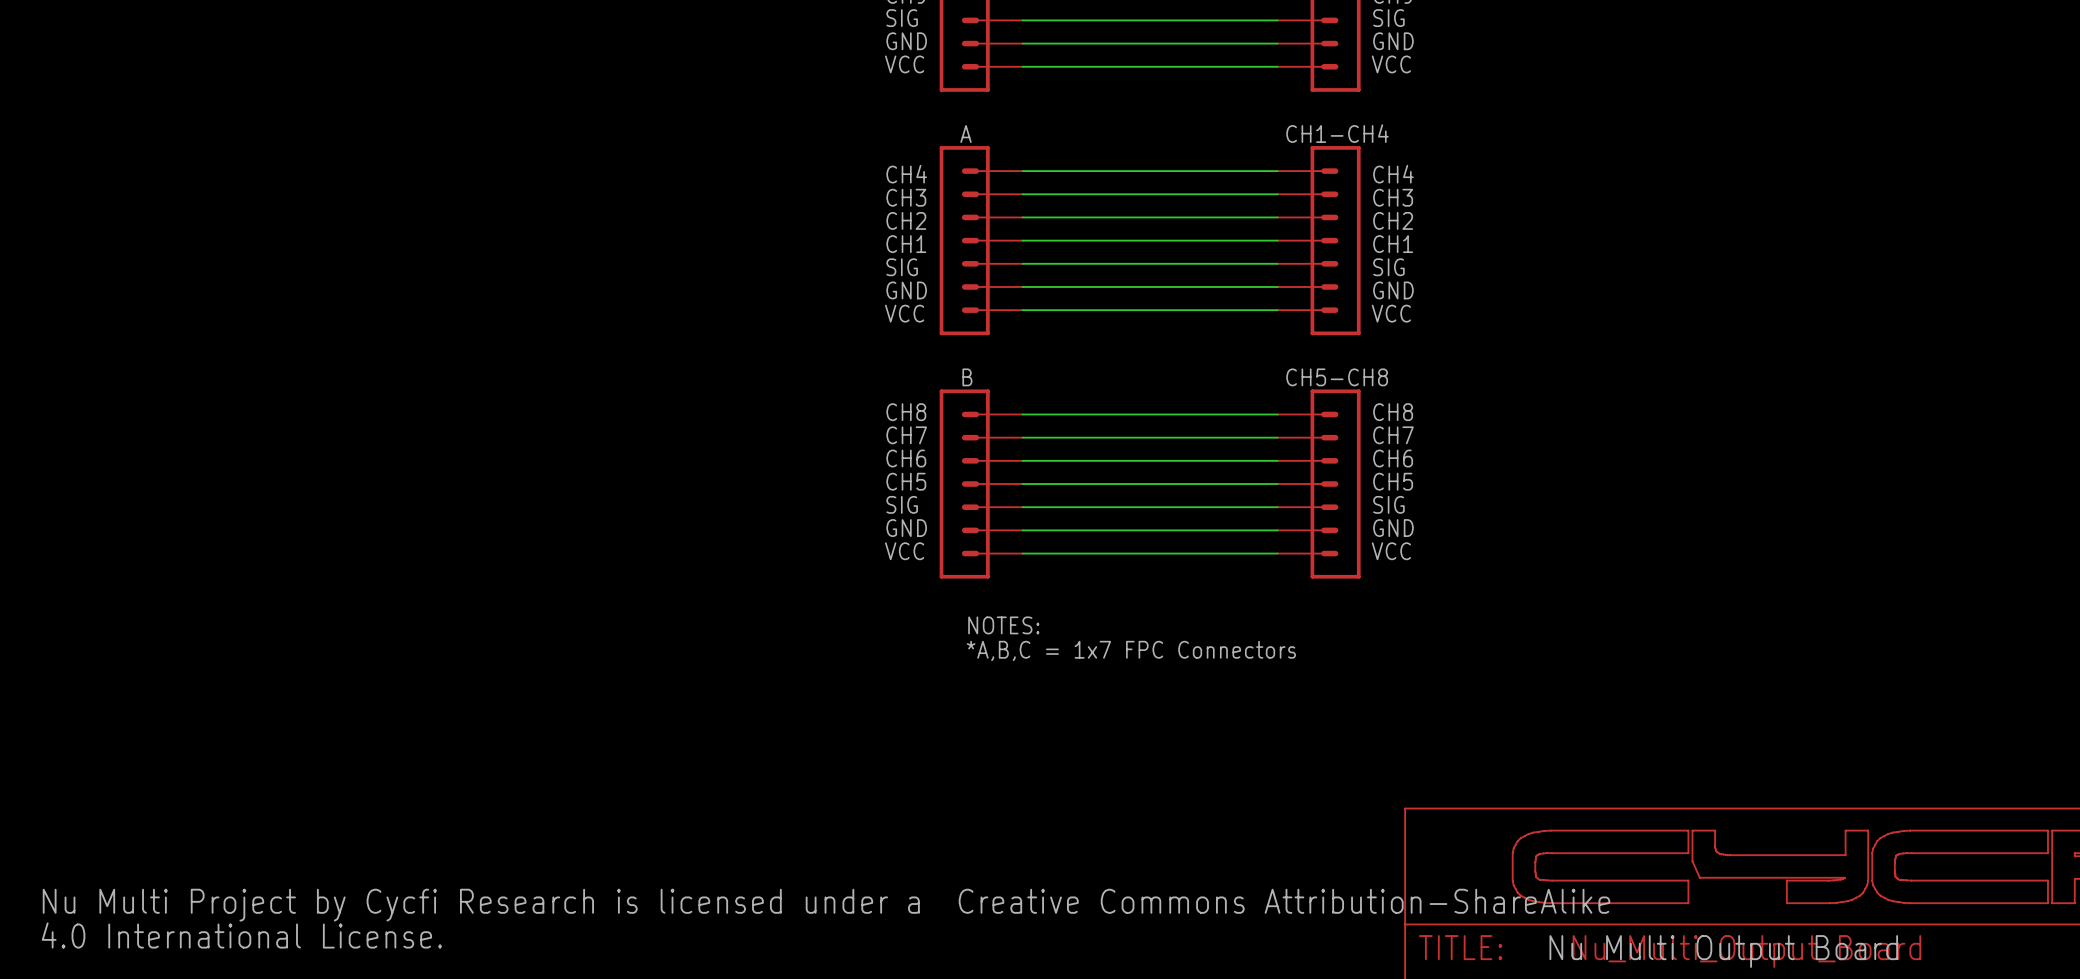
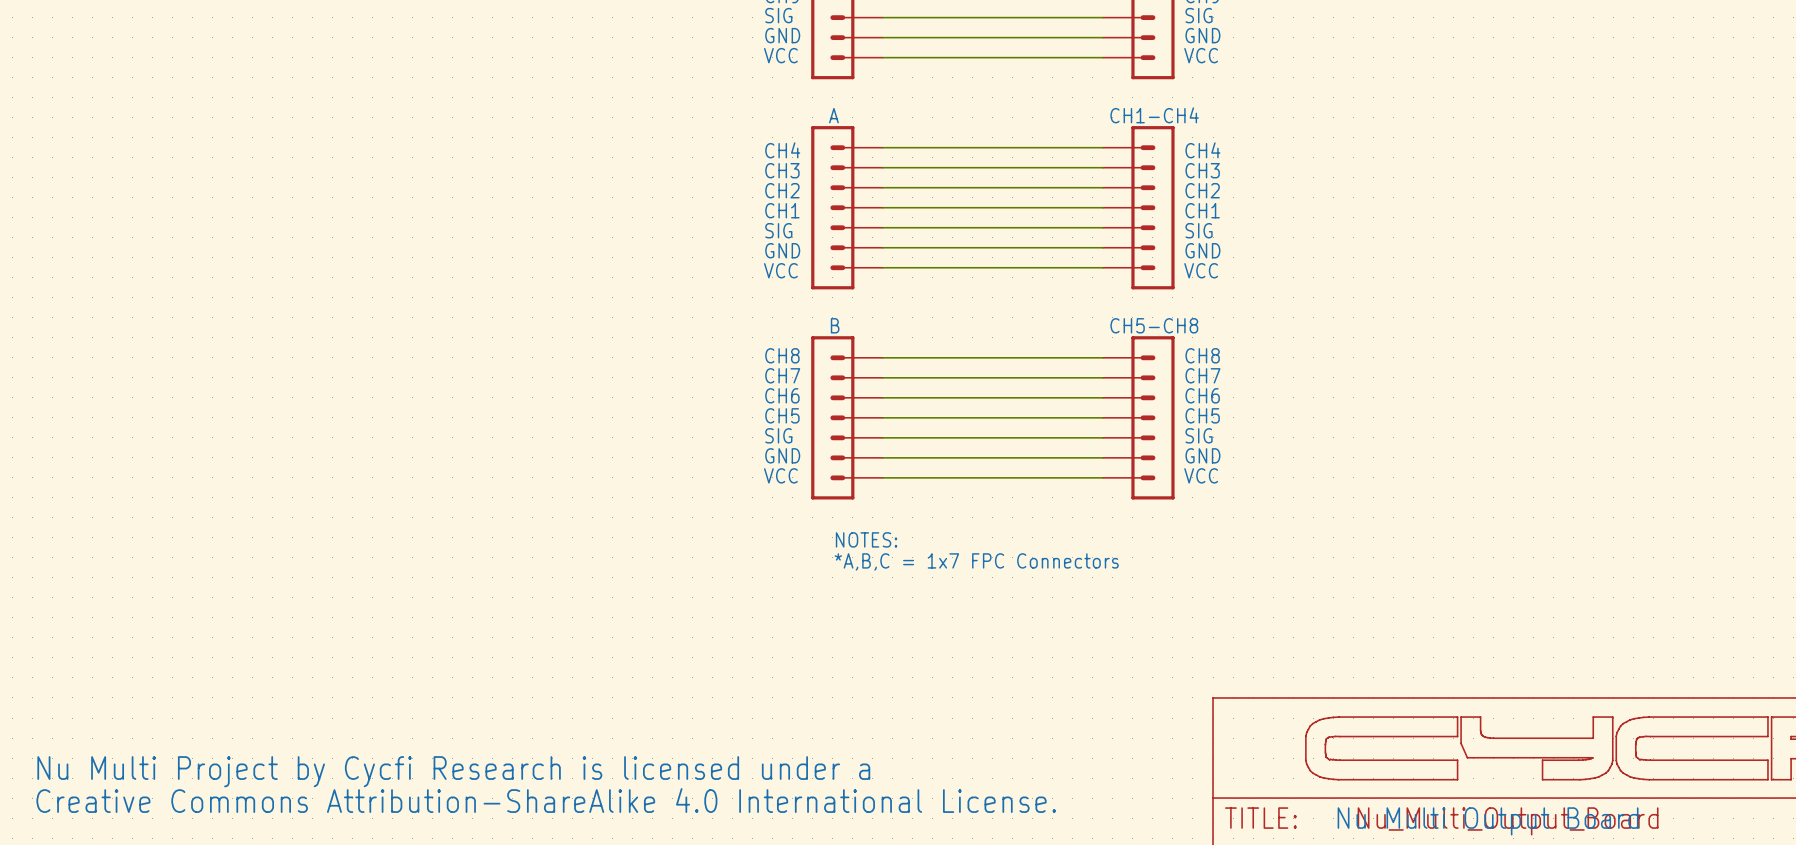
text: Nu Multi Project by Cycfi Research is licensed under a Creative Commons Attribution-ShareAlike (826, 905) -> Nu Multi Project by Cycfi Research is licensed under a (453, 771)
text: 4.0 International License. (241, 935) -> Creative Commons Attribution-ShareAlike 4.0 International License. (546, 800)

